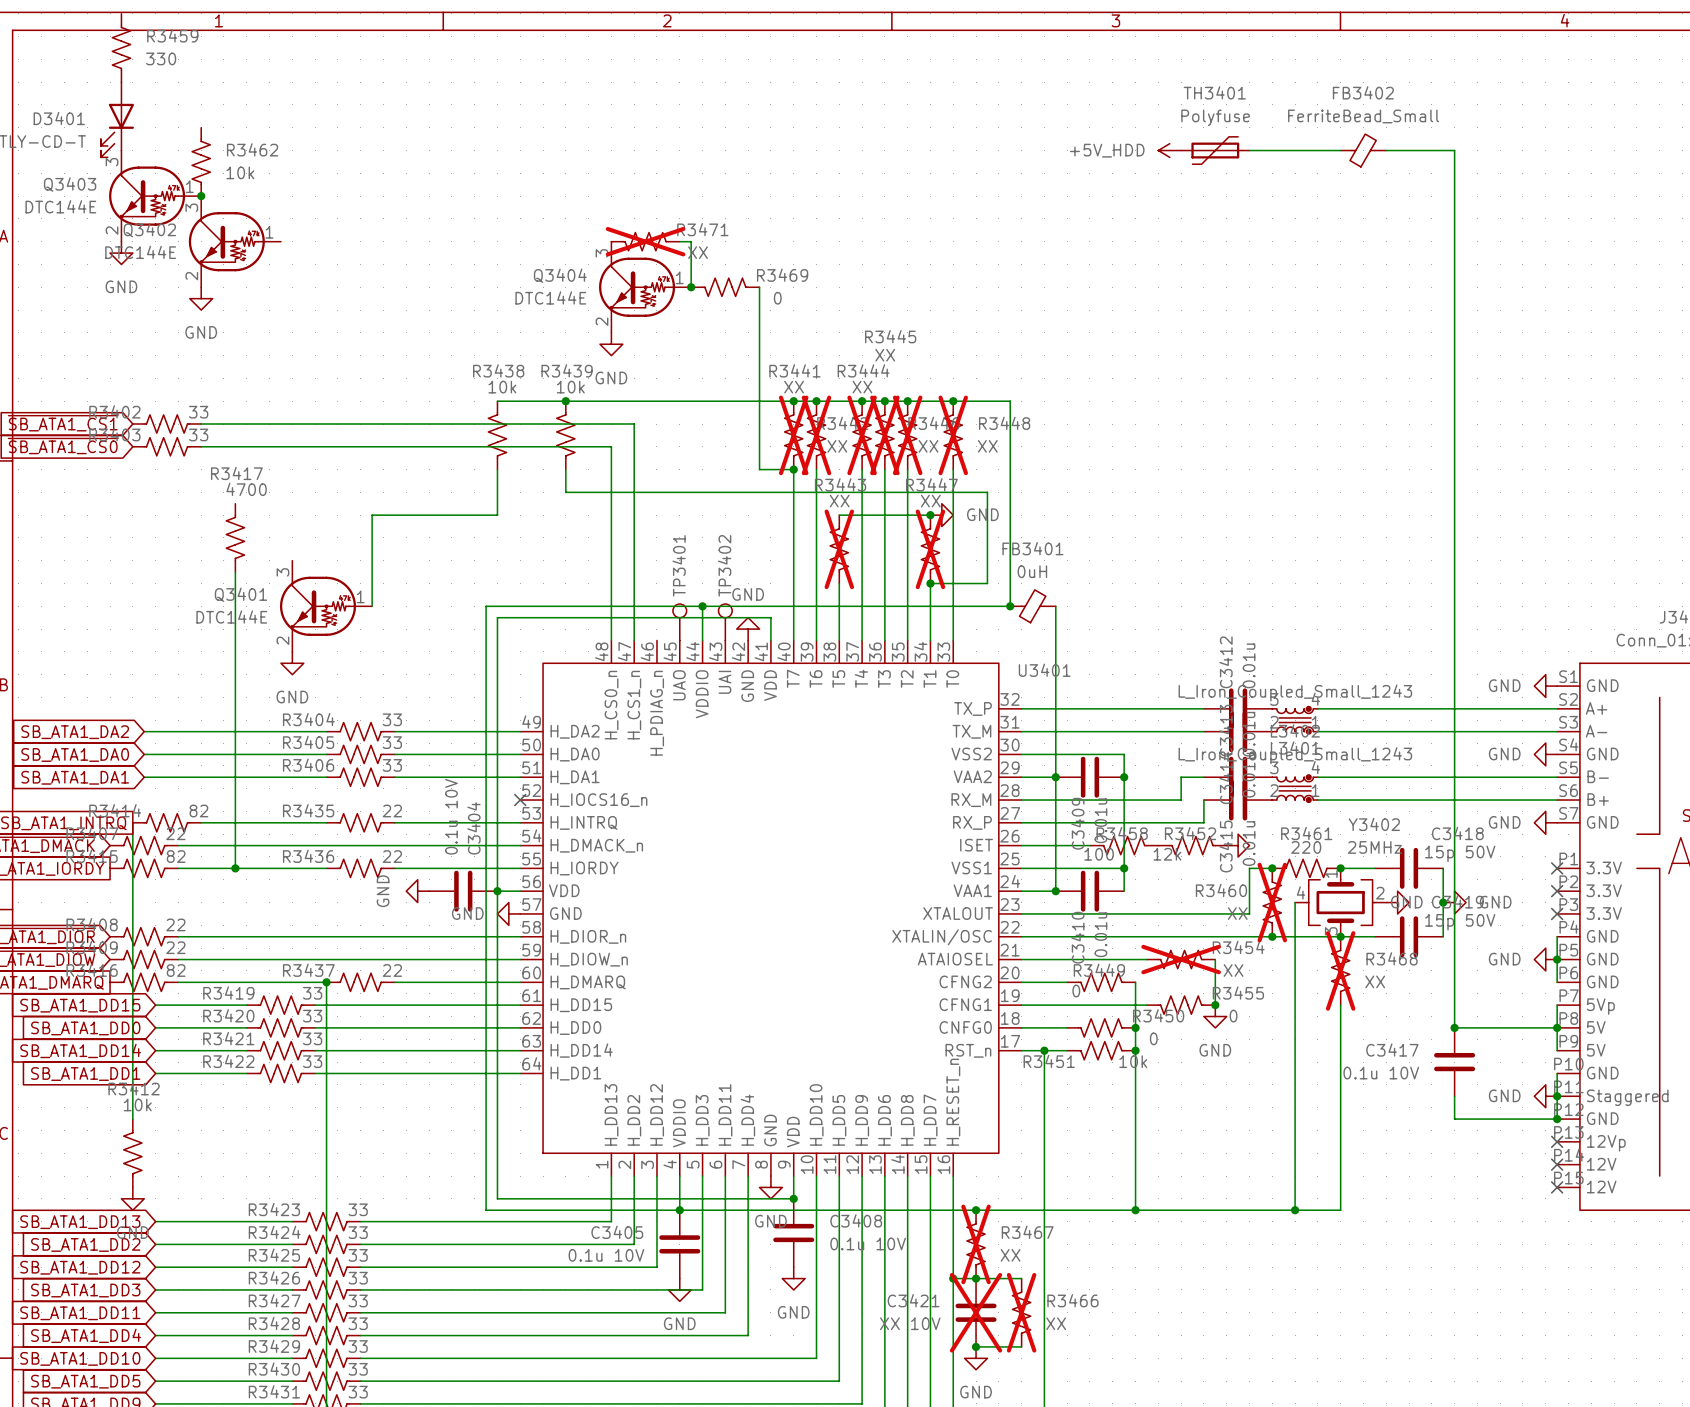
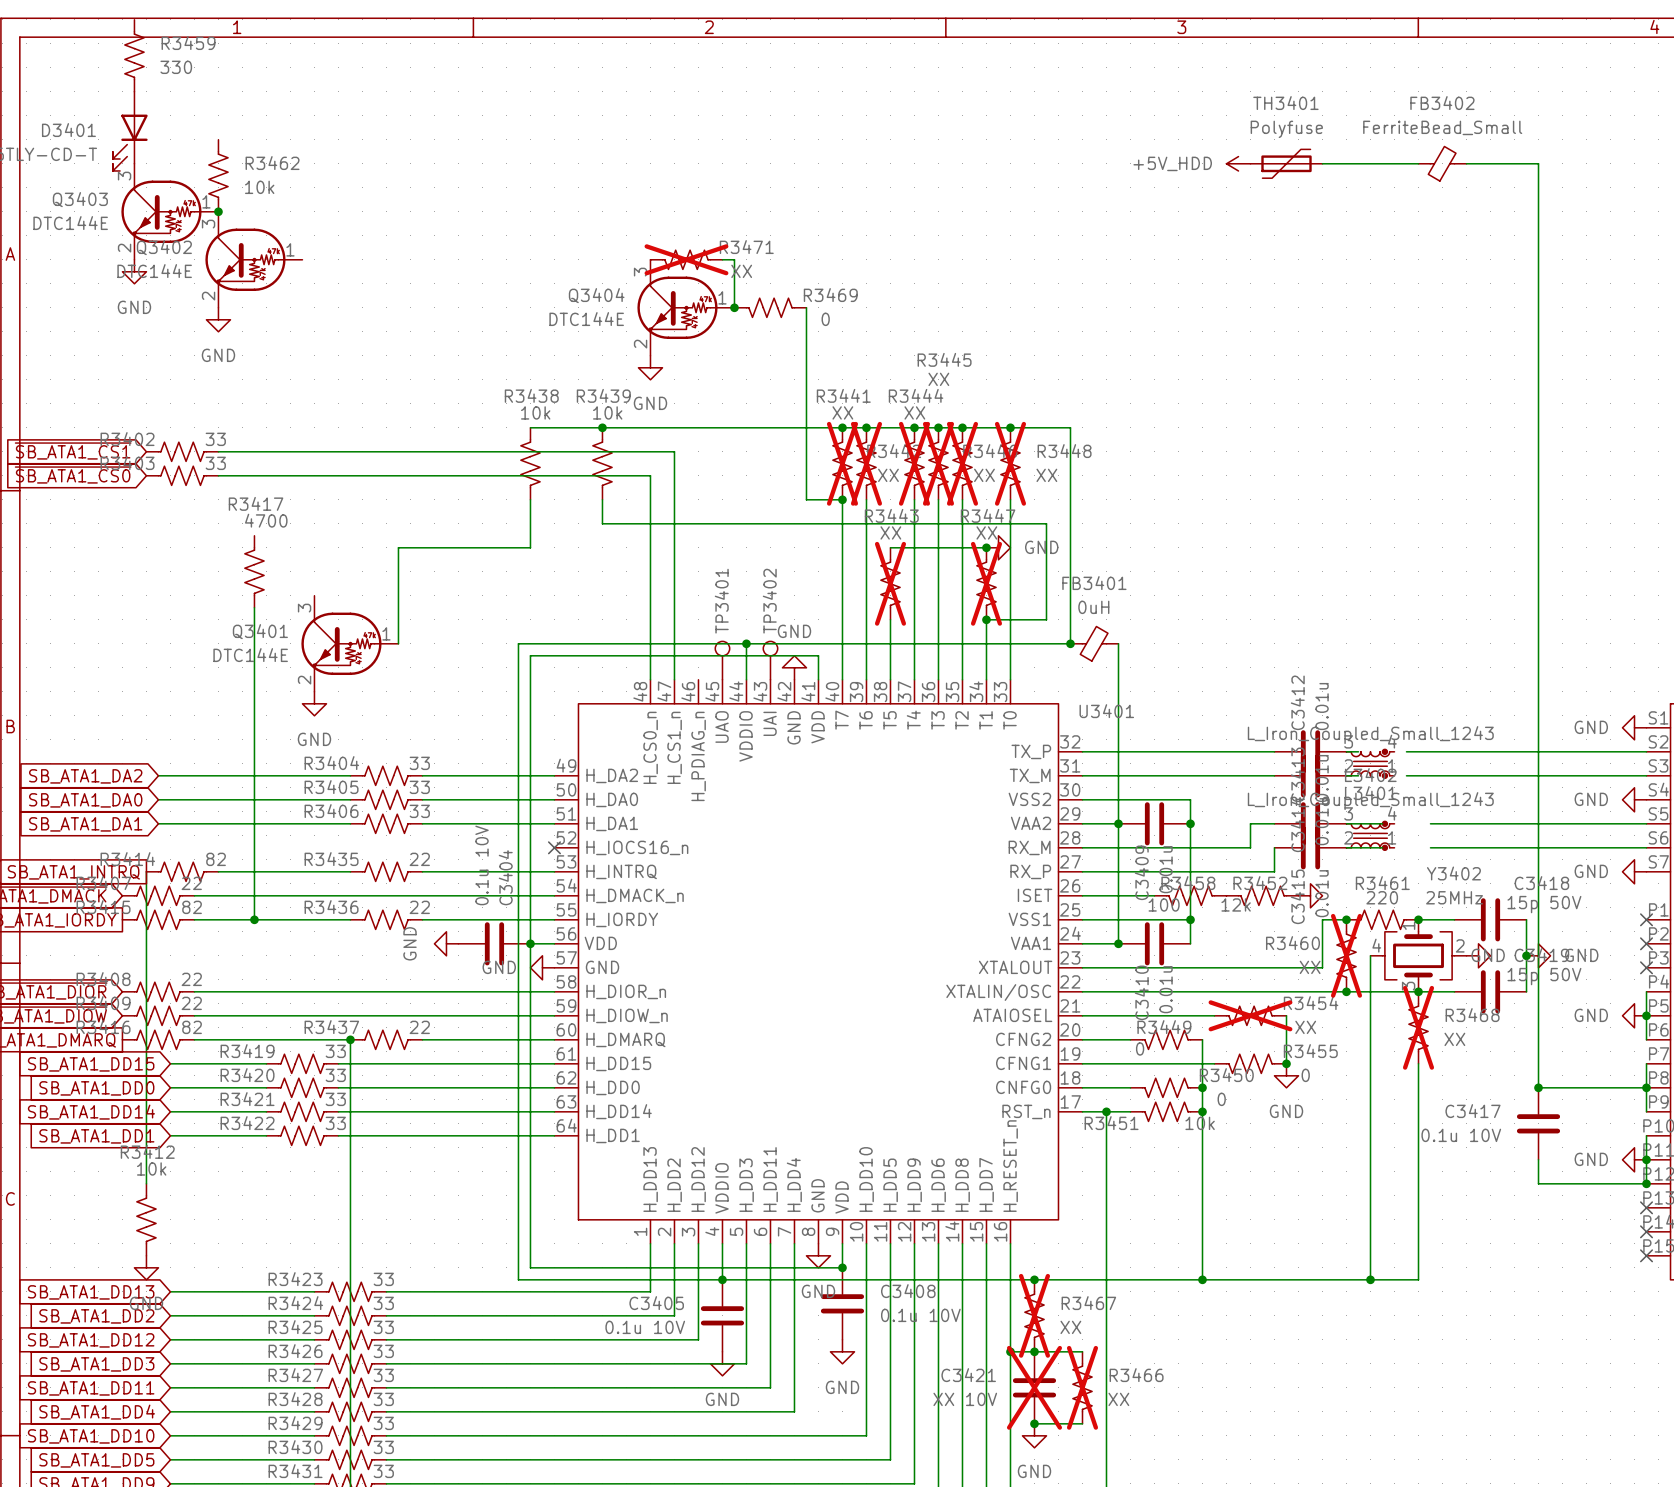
wire: (1317, 708) (1329, 708) -> (1346, 751) (1358, 751)
wire: (1317, 731) (1329, 731) -> (1346, 775) (1358, 775)
wire: (1317, 777) (1352, 777) -> (1346, 823) (1382, 823)
wire: (1317, 800) (1352, 800) -> (1346, 847) (1382, 847)

